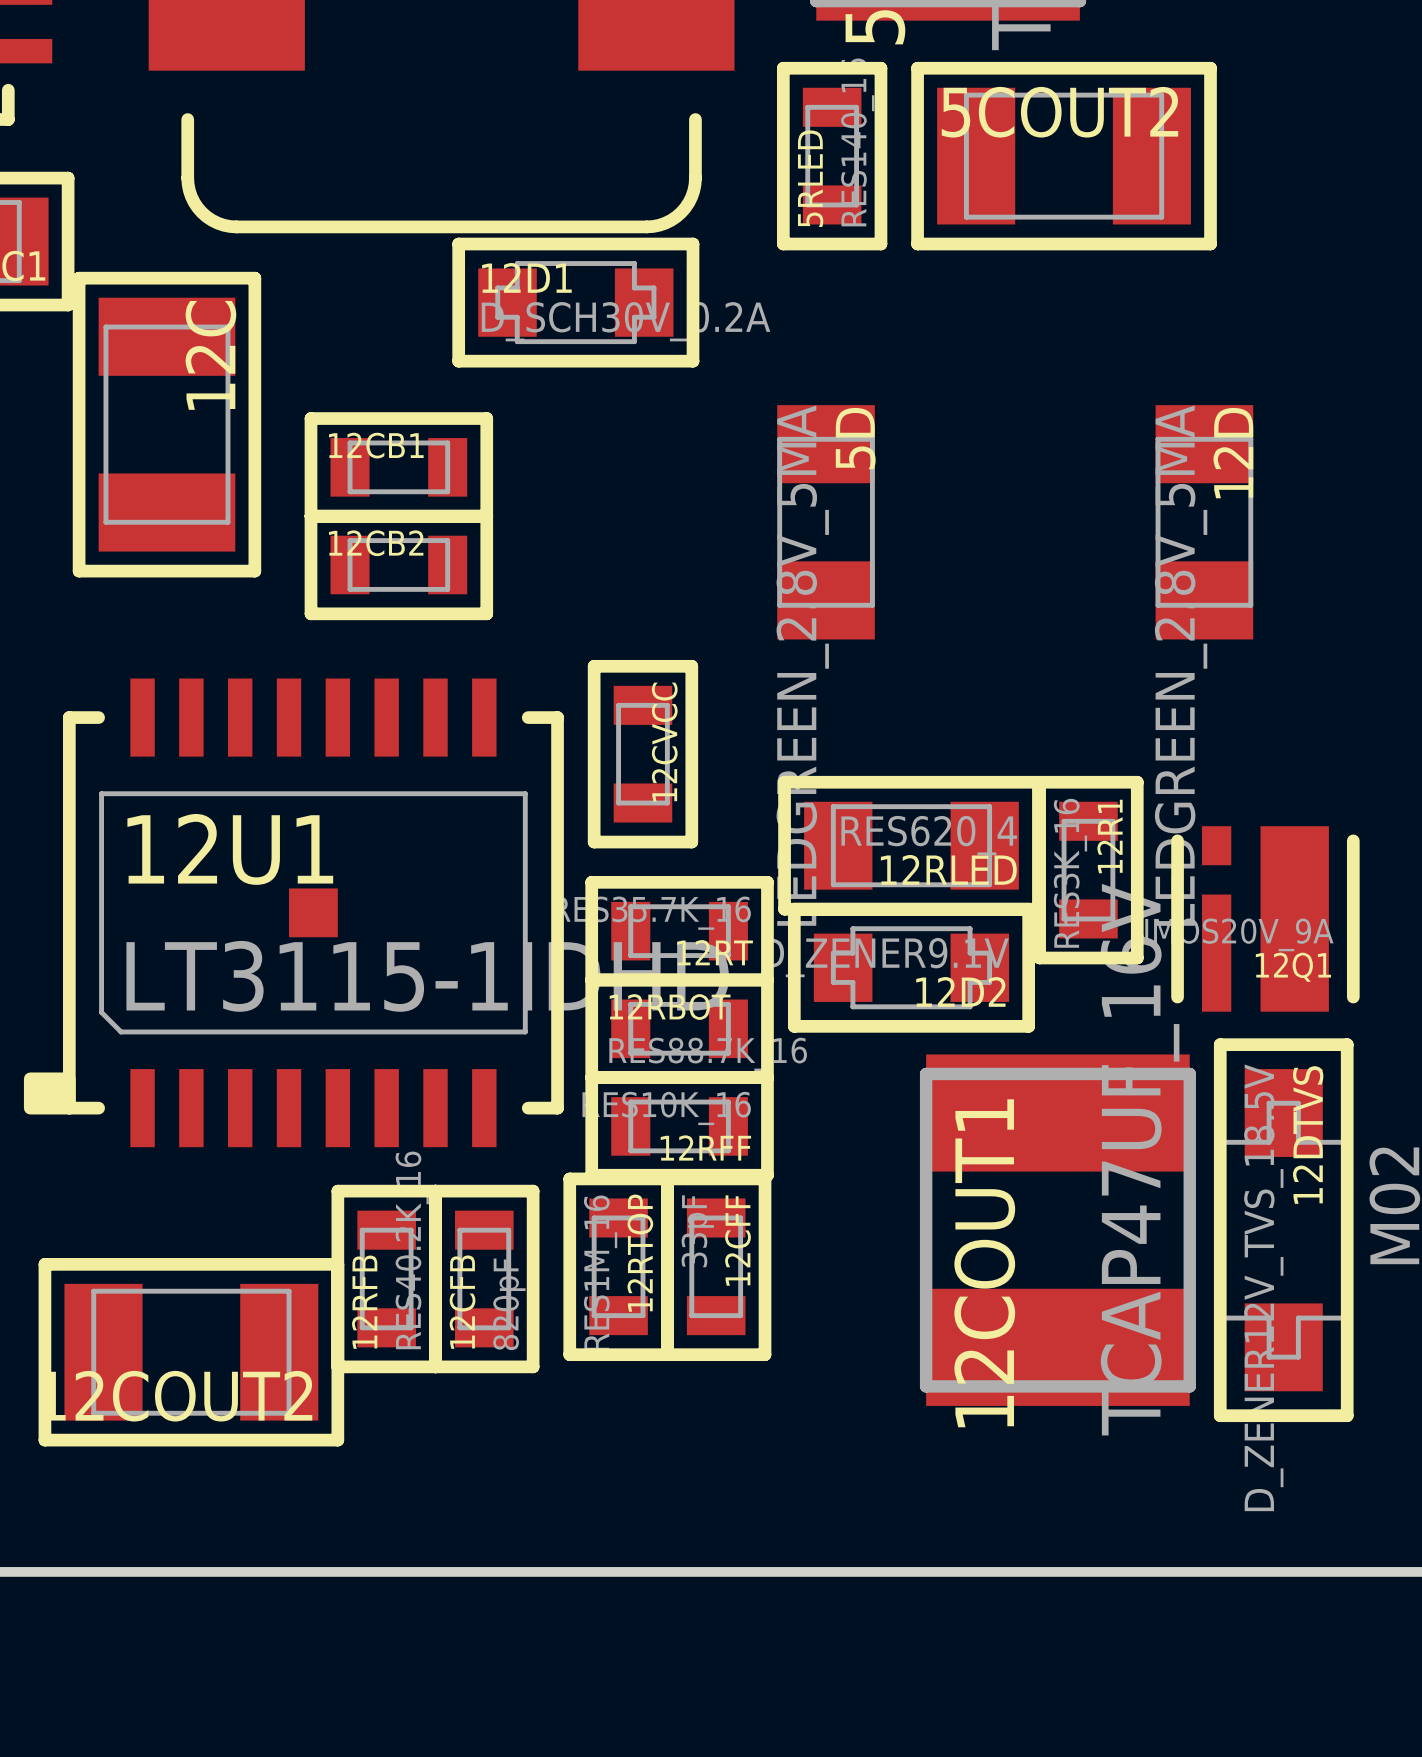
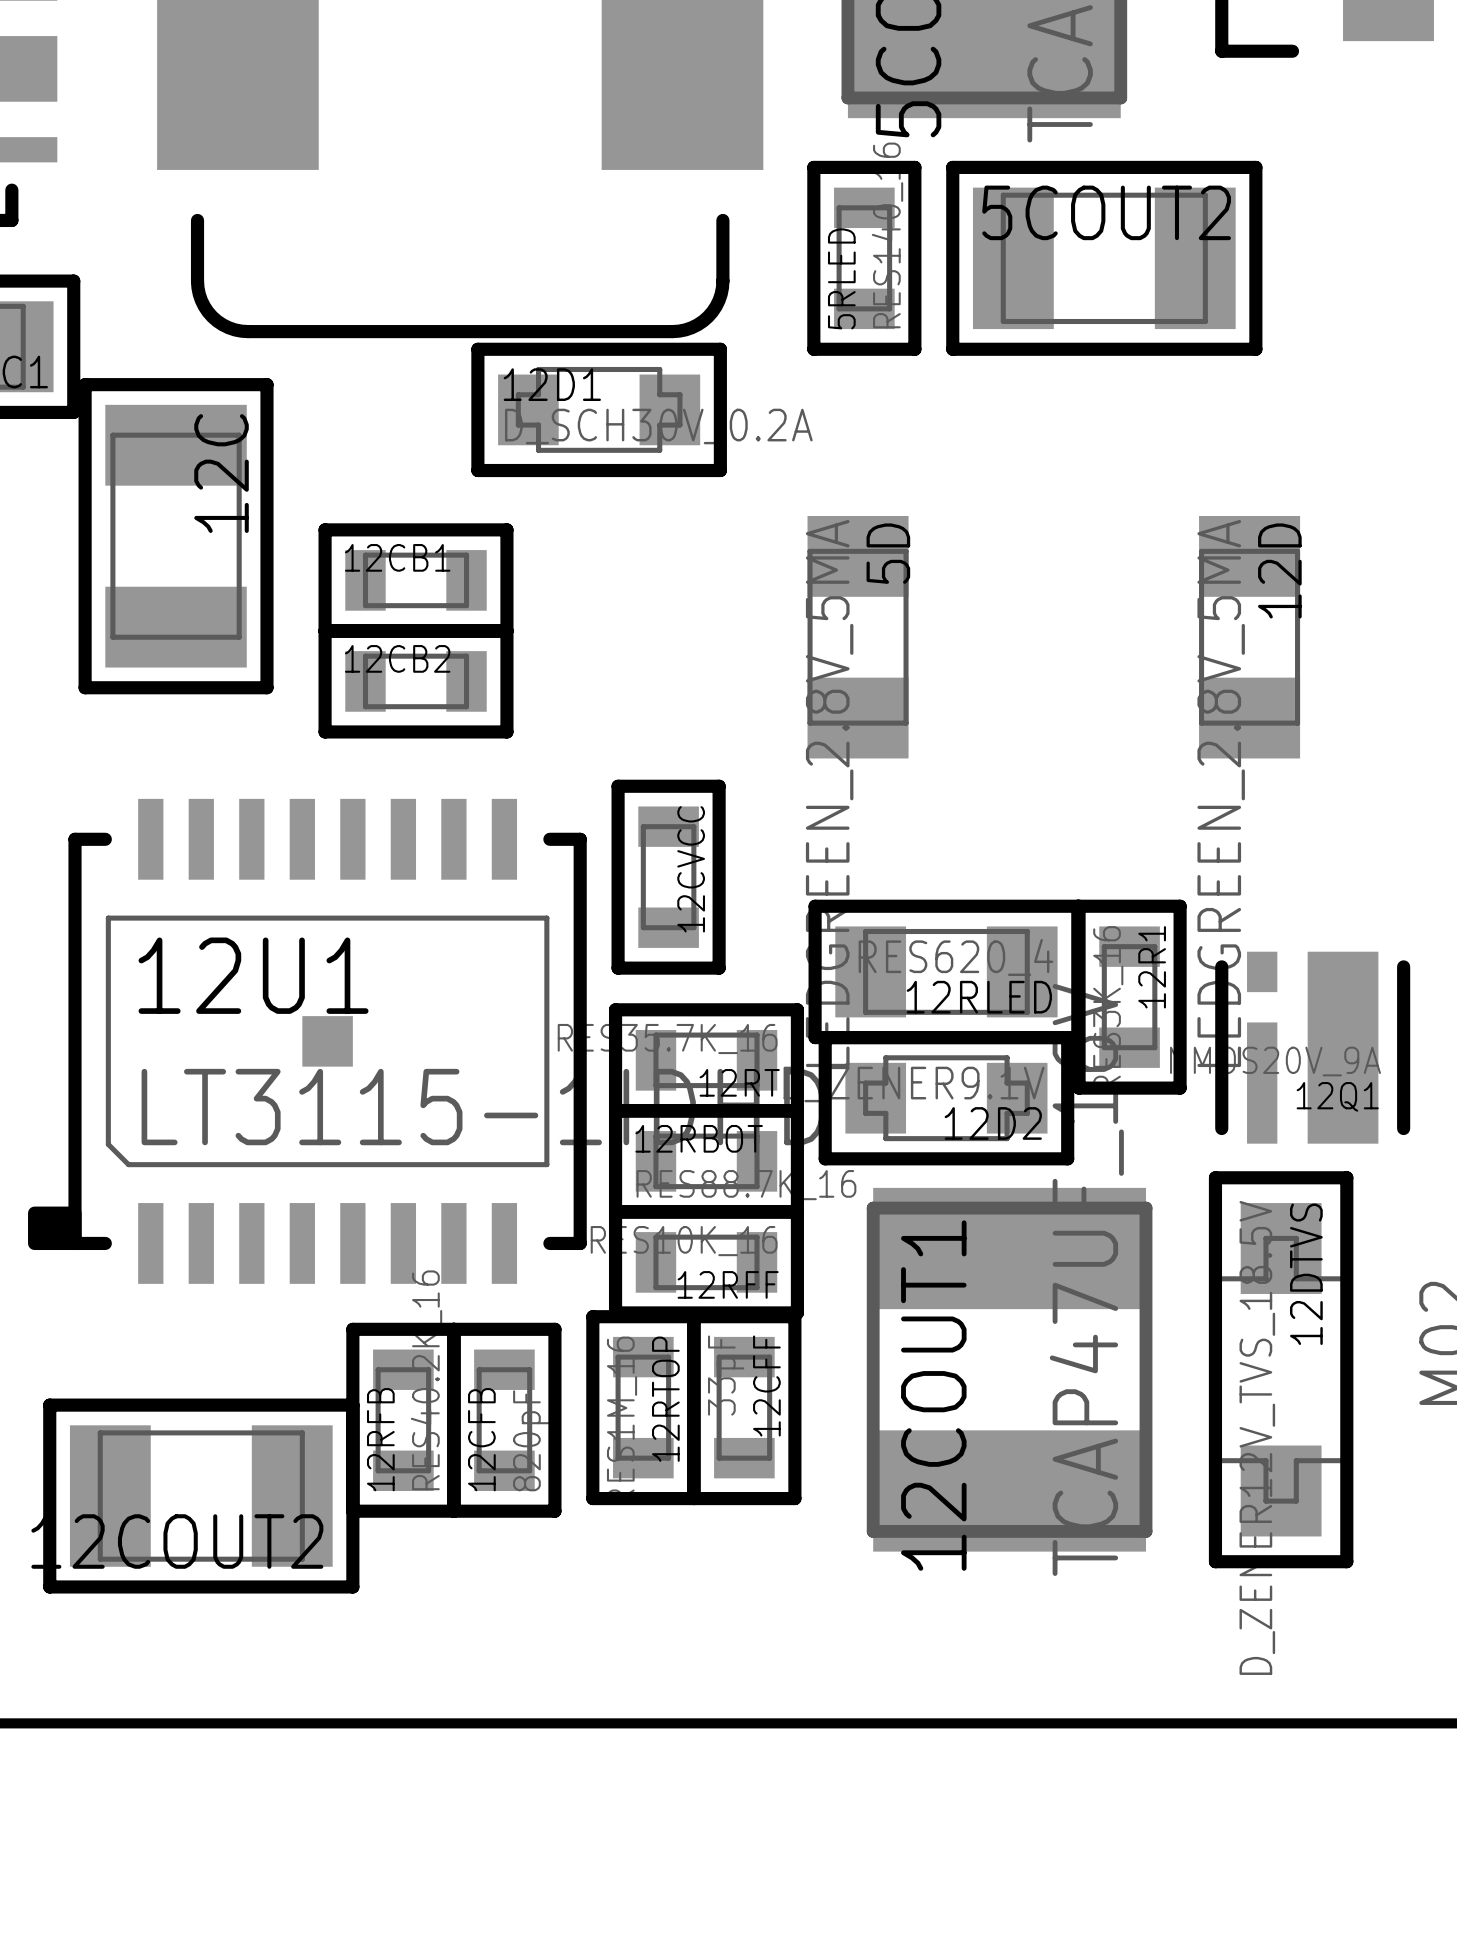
12COUT1 position: (1057, 1230) -> (1009, 1369)
12DTVS position: (1283, 1230) -> (1281, 1369)

